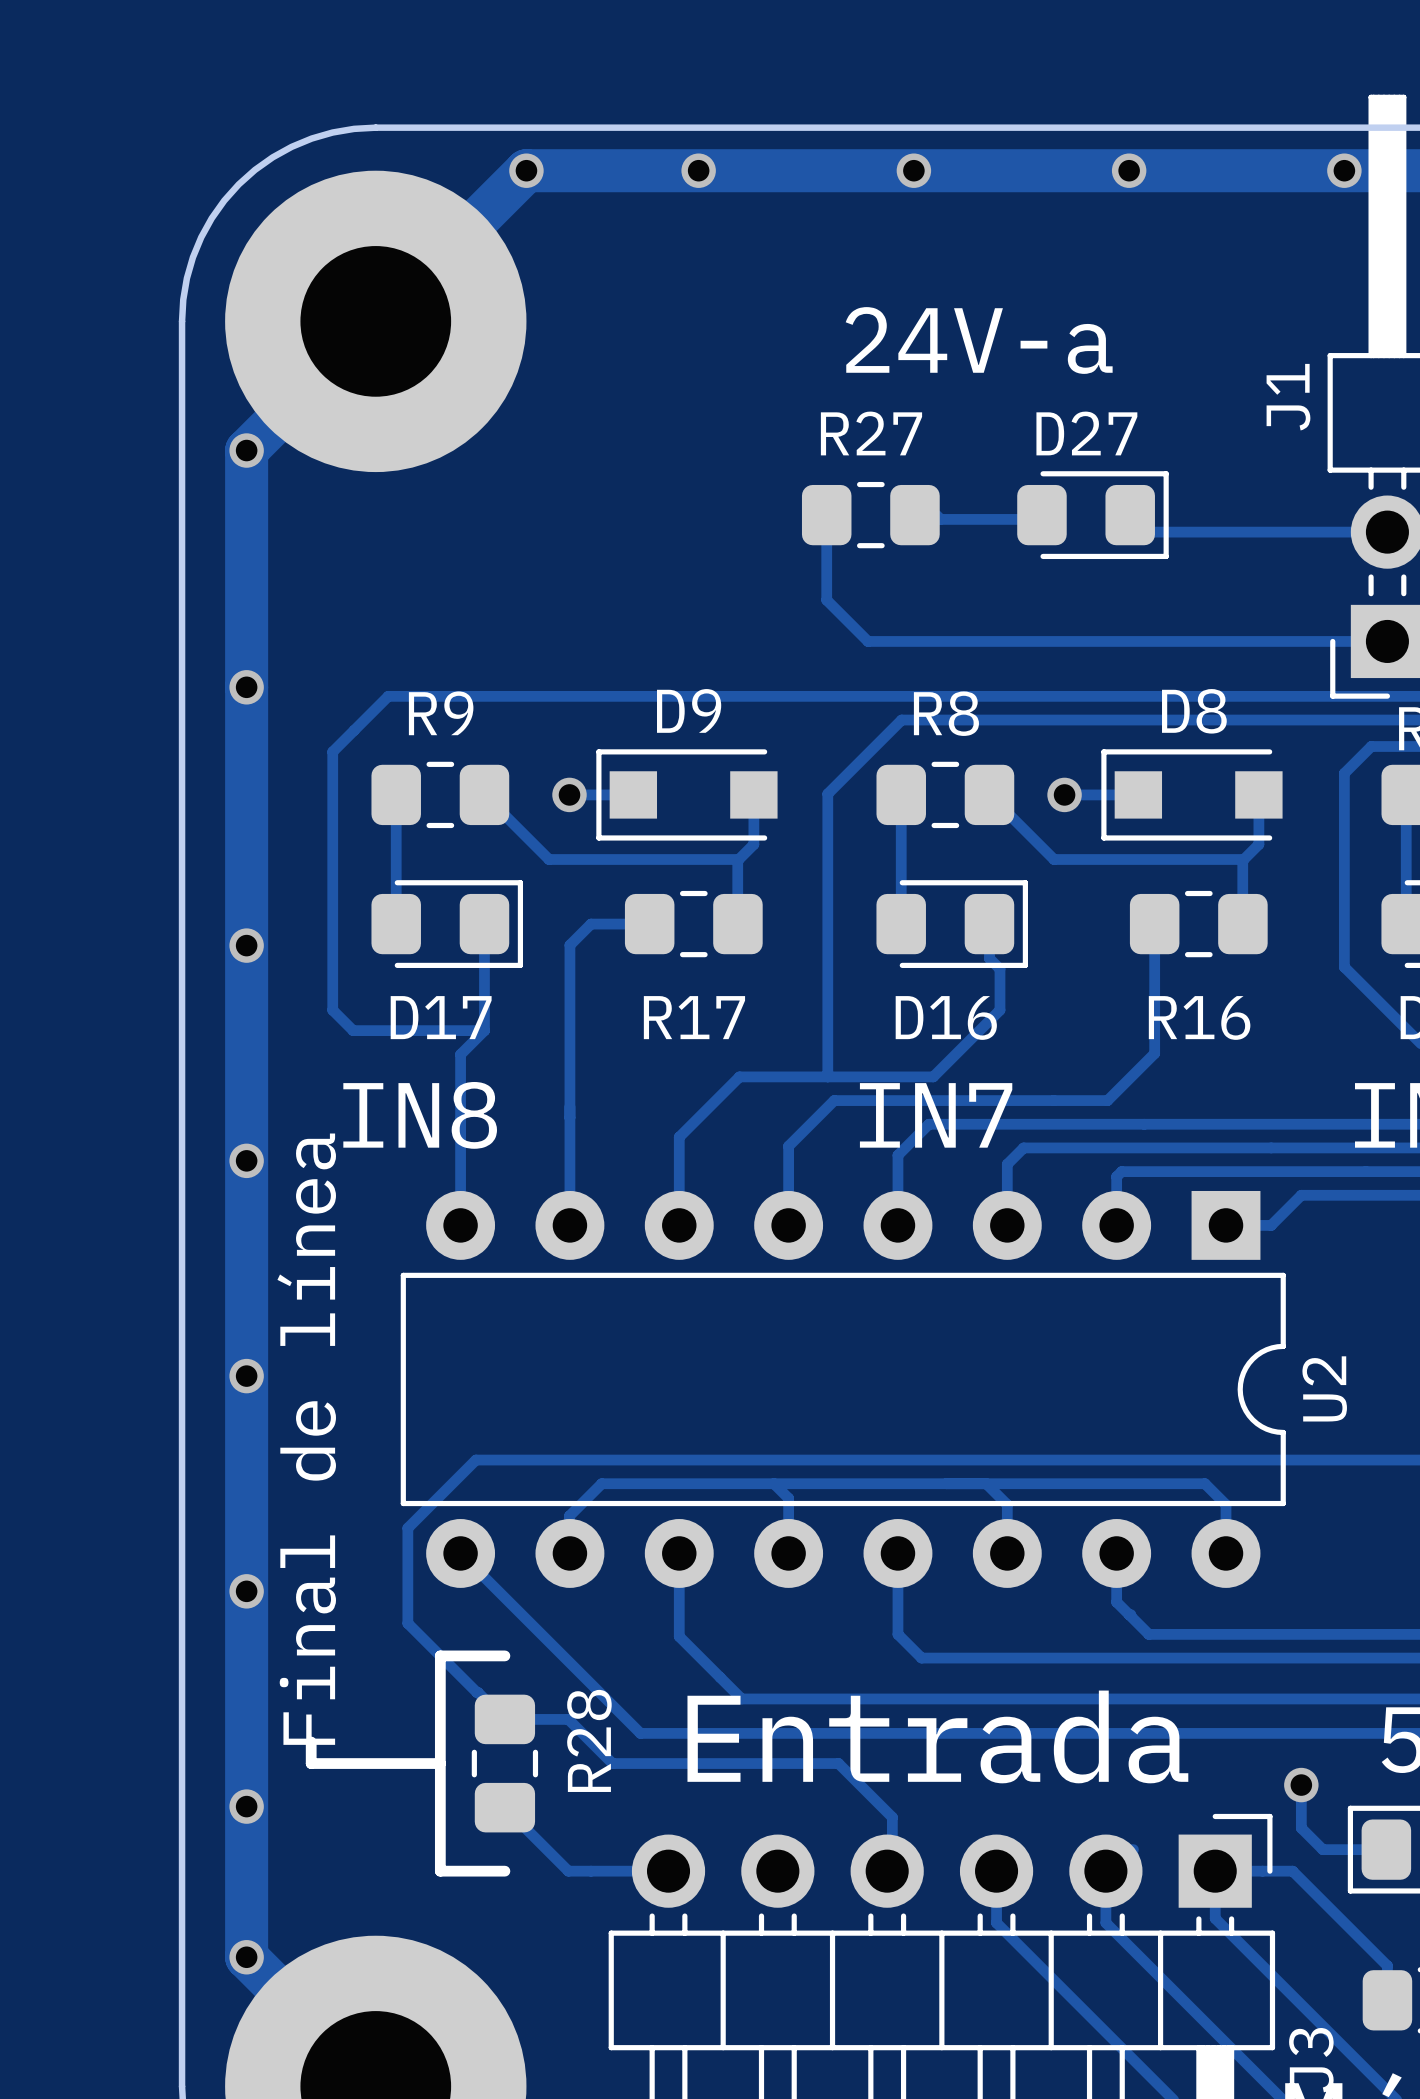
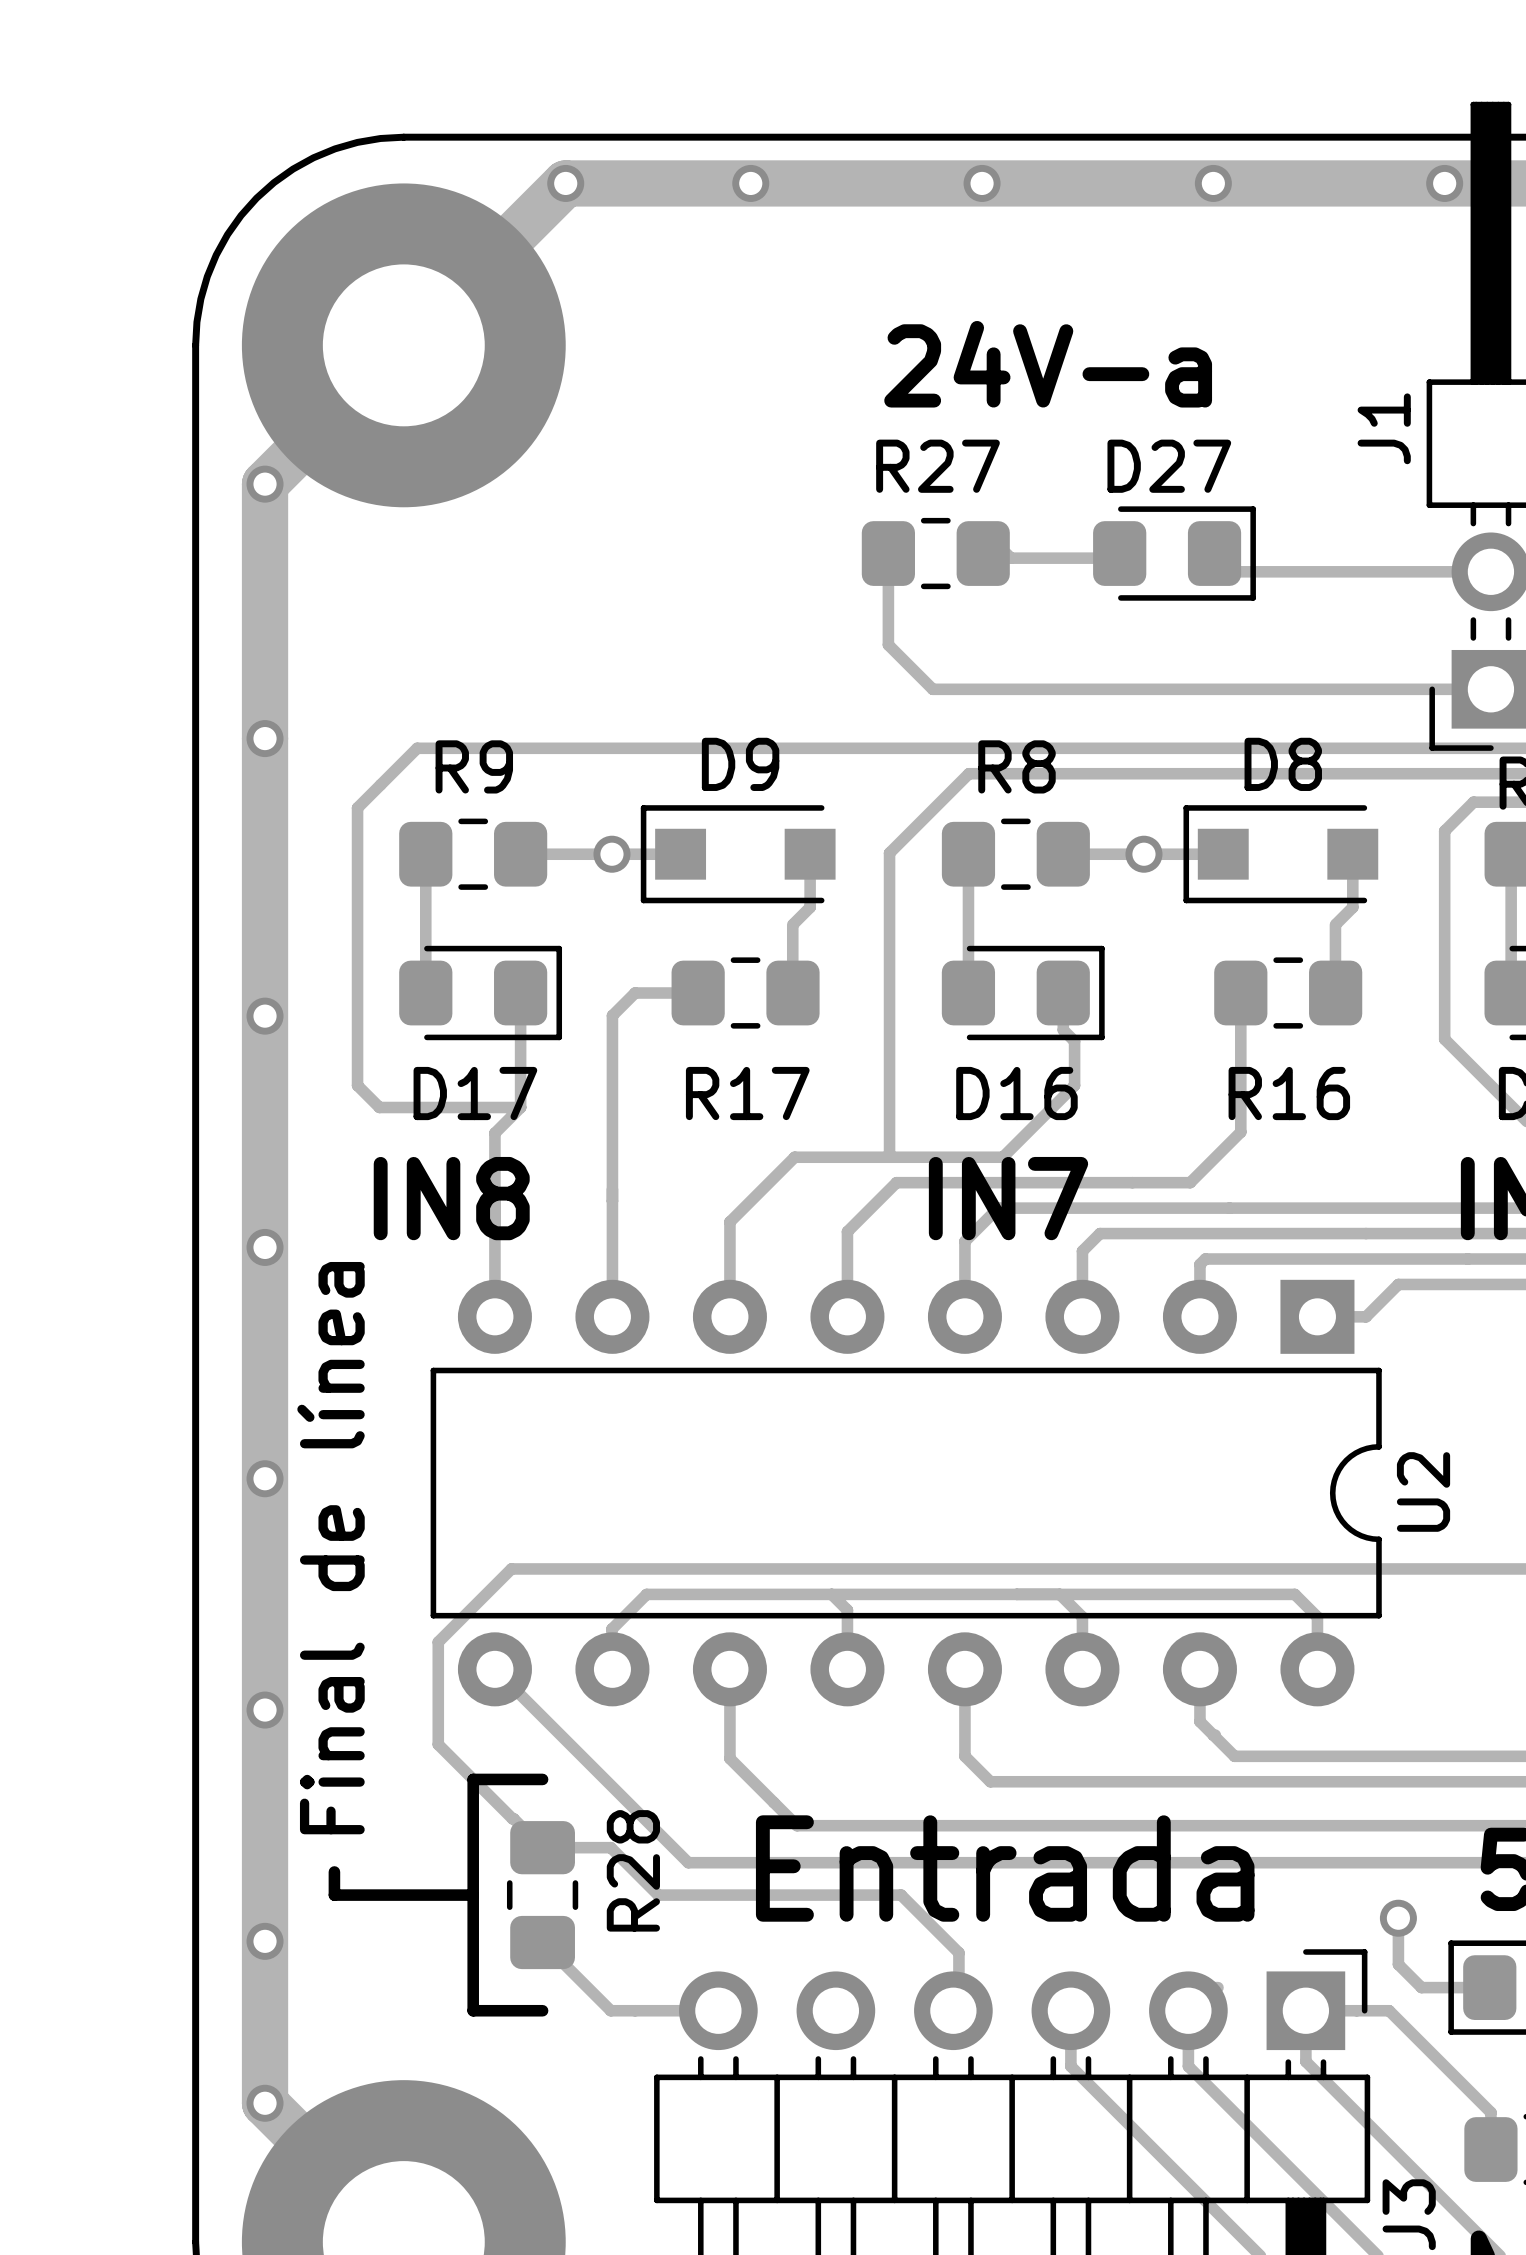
track: (484, 794) (549, 859) (738, 859) -> (520, 854) (611, 854)
track: (989, 794) (1054, 859) (1243, 859) -> (1063, 854) (1143, 854)

